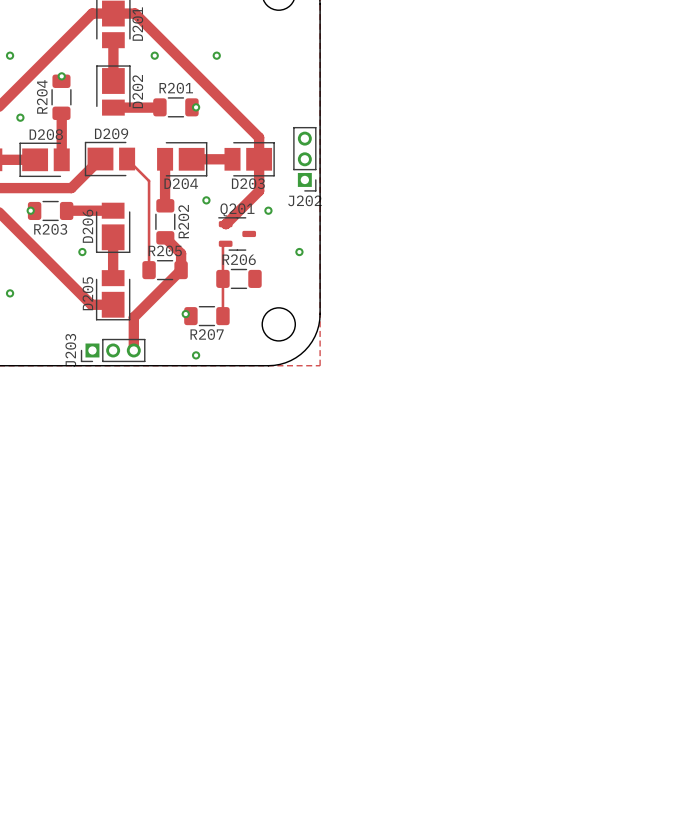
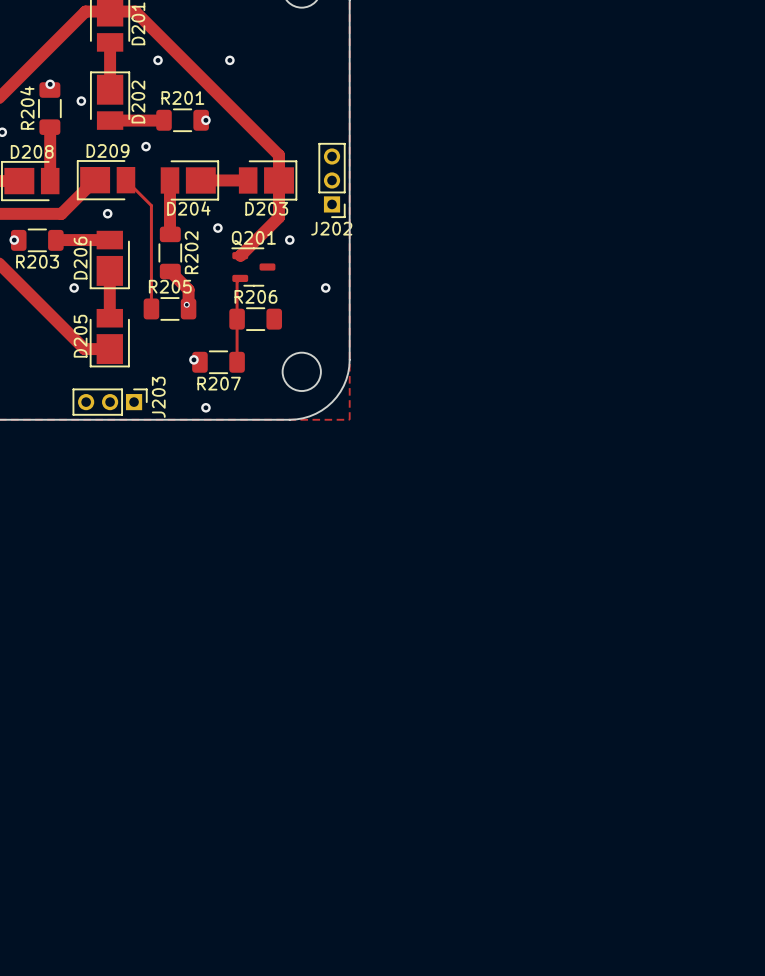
via: none -> (81, 101)
via: none -> (146, 146)
via: none -> (107, 213)
via: none -> (186, 304)
track: (181, 270) (133, 317) (133, 350) -> none
J203 rotation: 0° (113, 350) -> 180° (110, 402)

